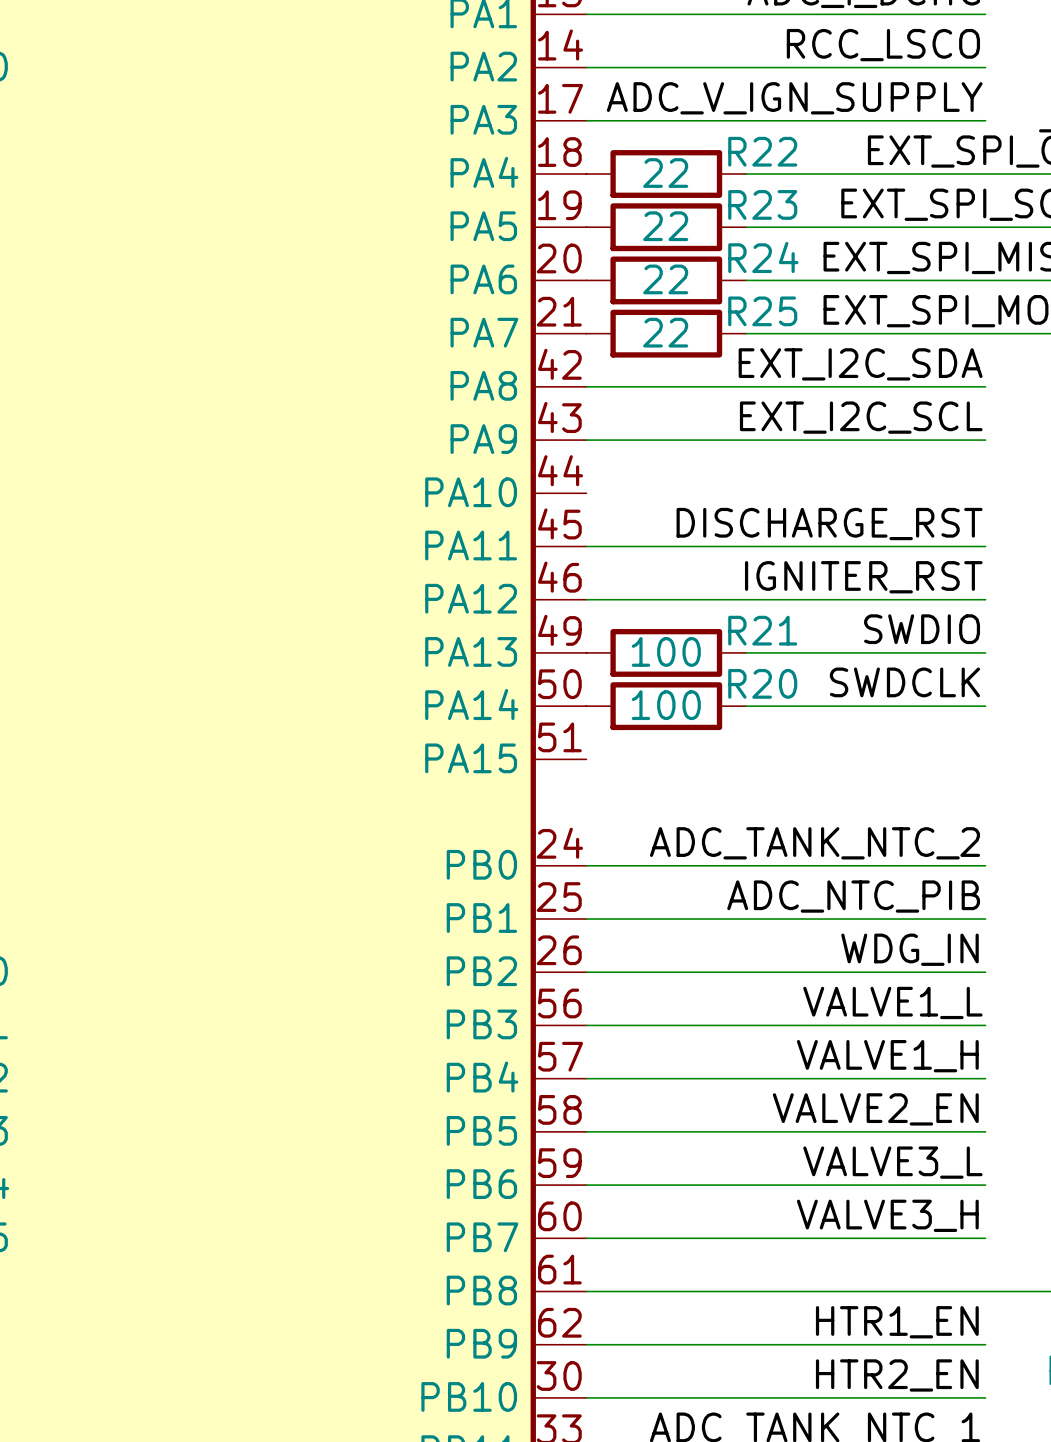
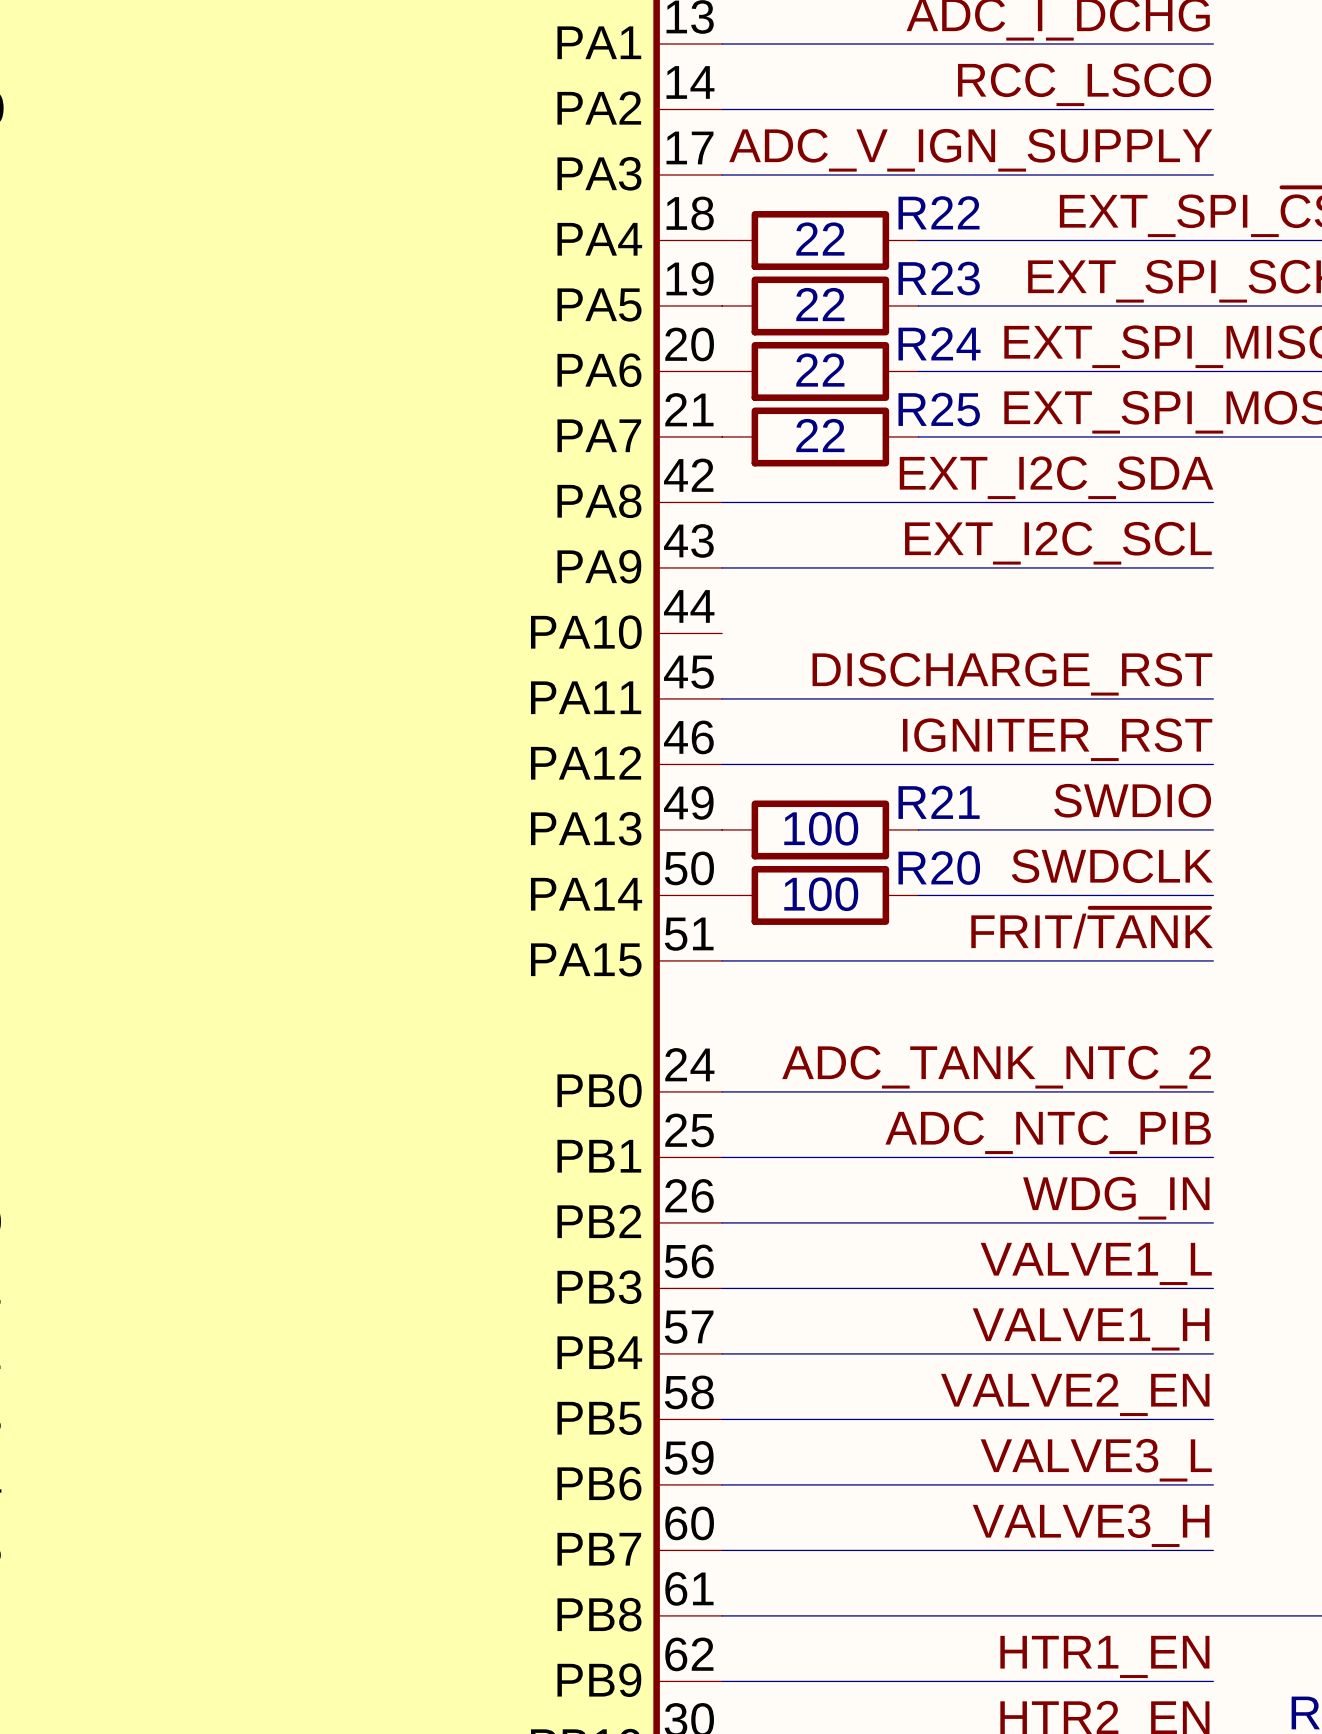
label: none -> FRIT/~{TANK} (1092, 928)
wire: none -> (722, 960) (1213, 960)

